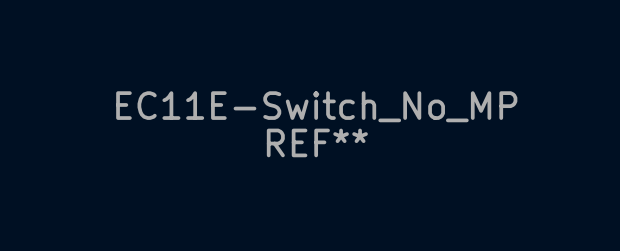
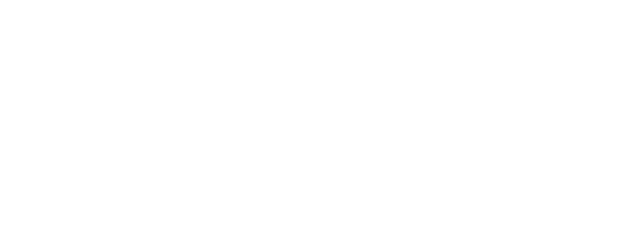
REF**: EC11E-Switch_No_MP (316, 124) -> none

